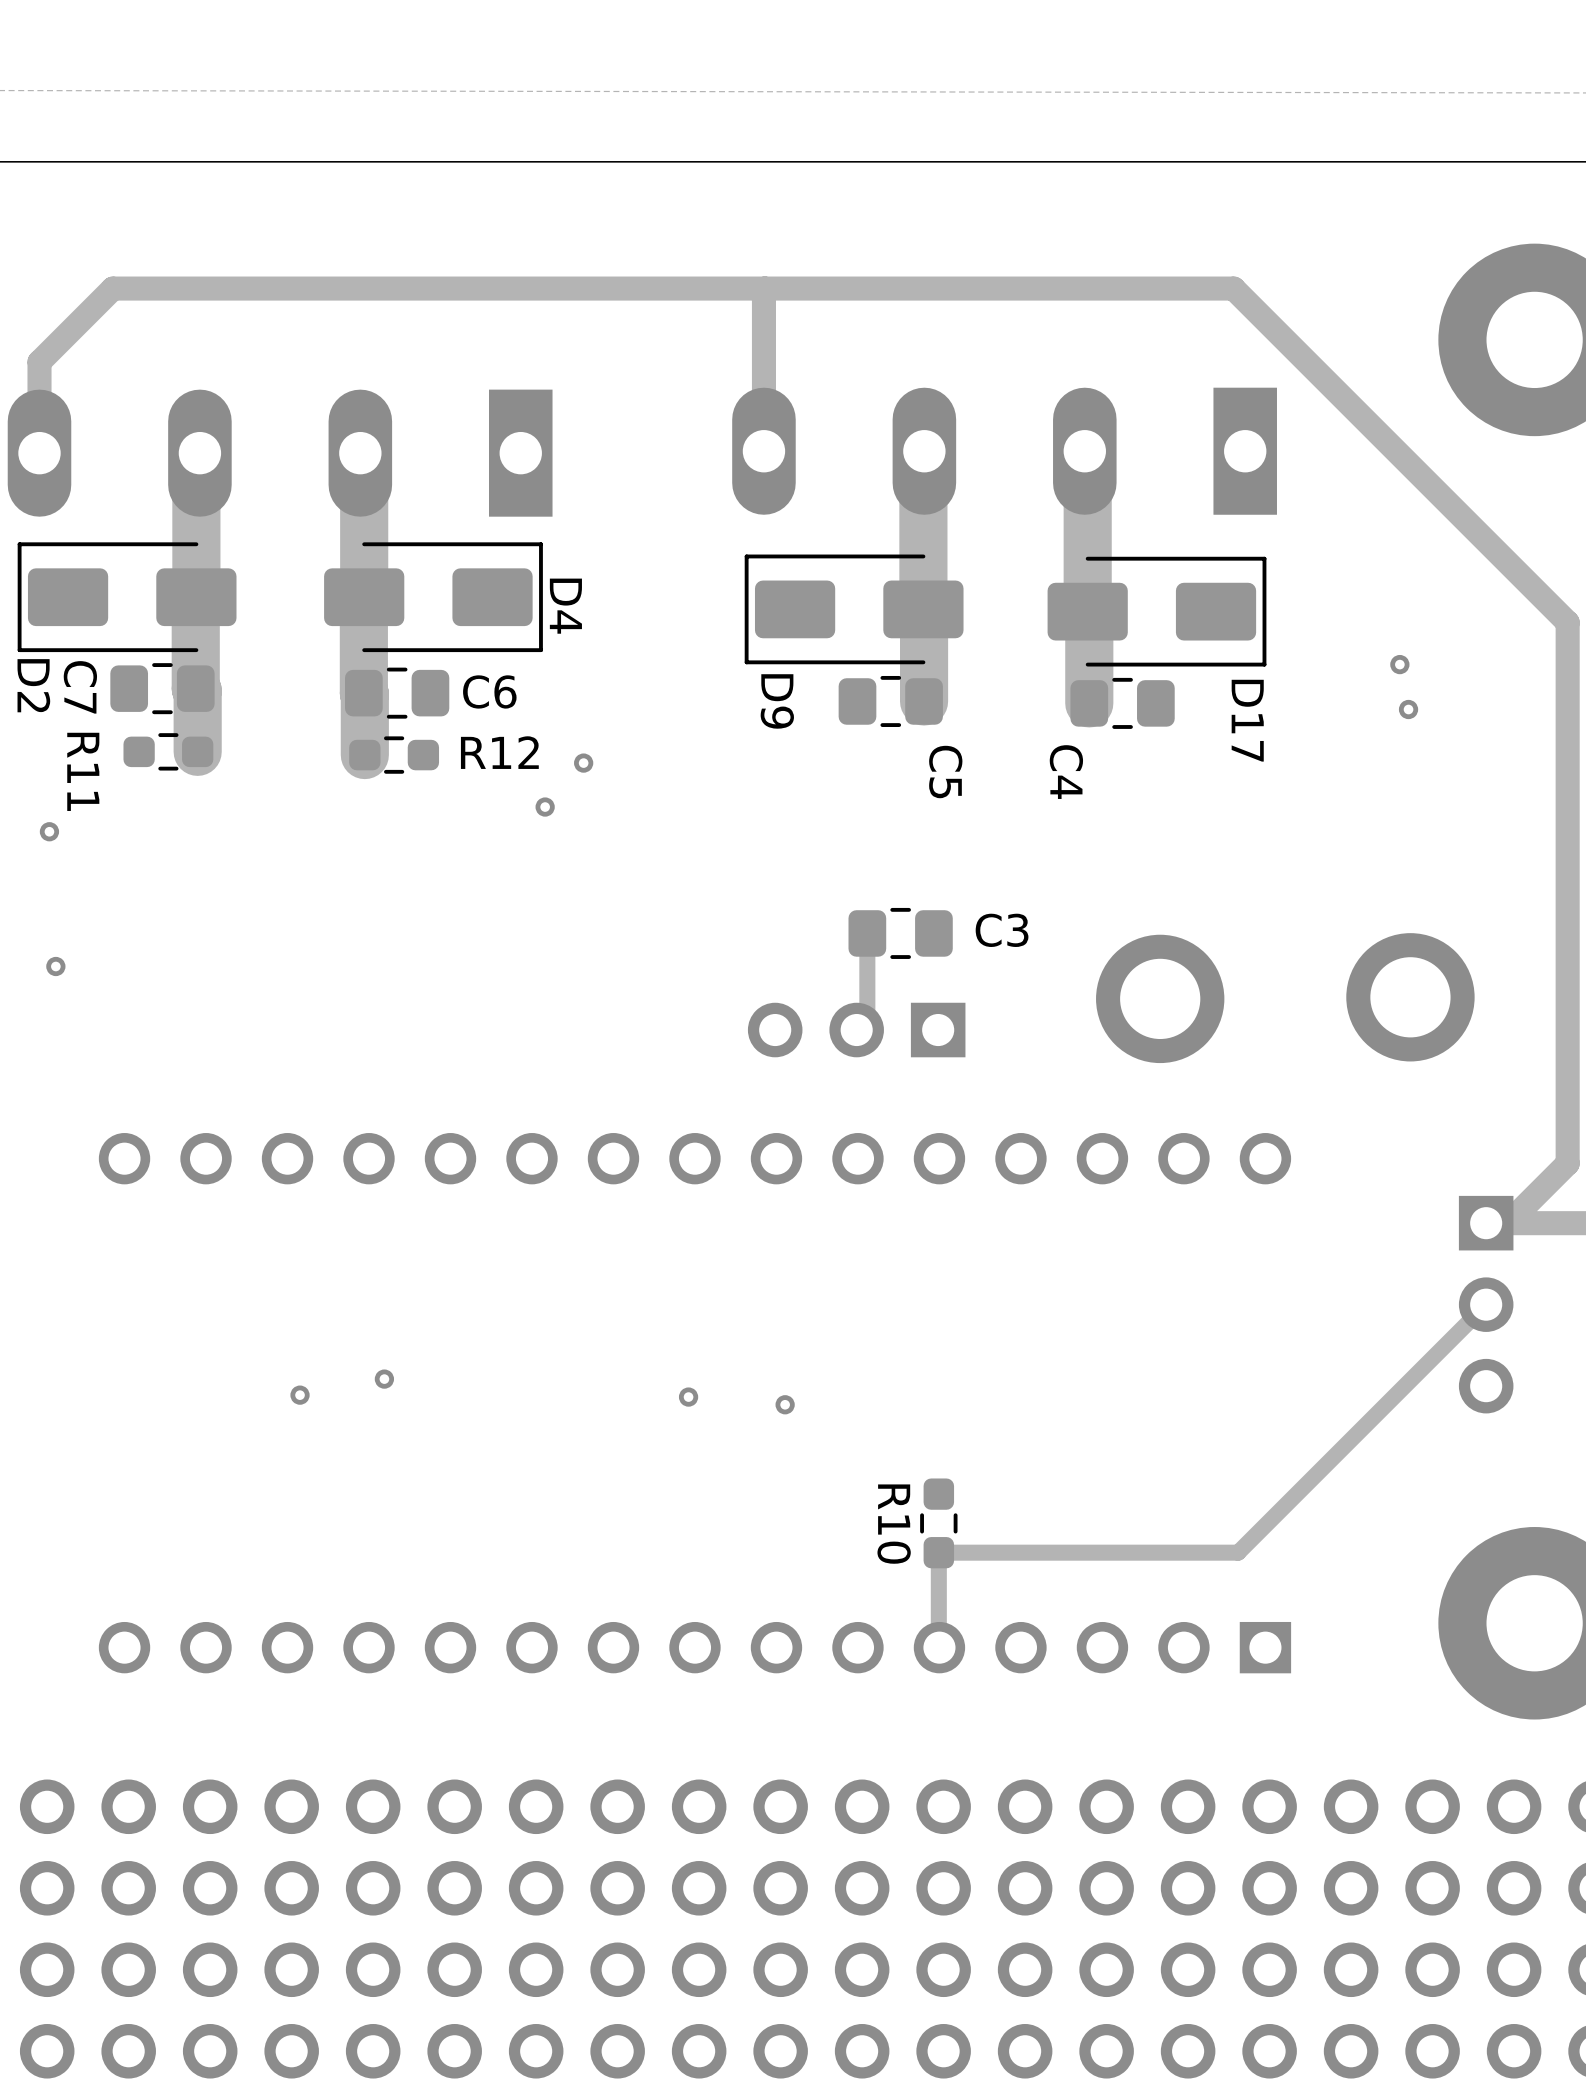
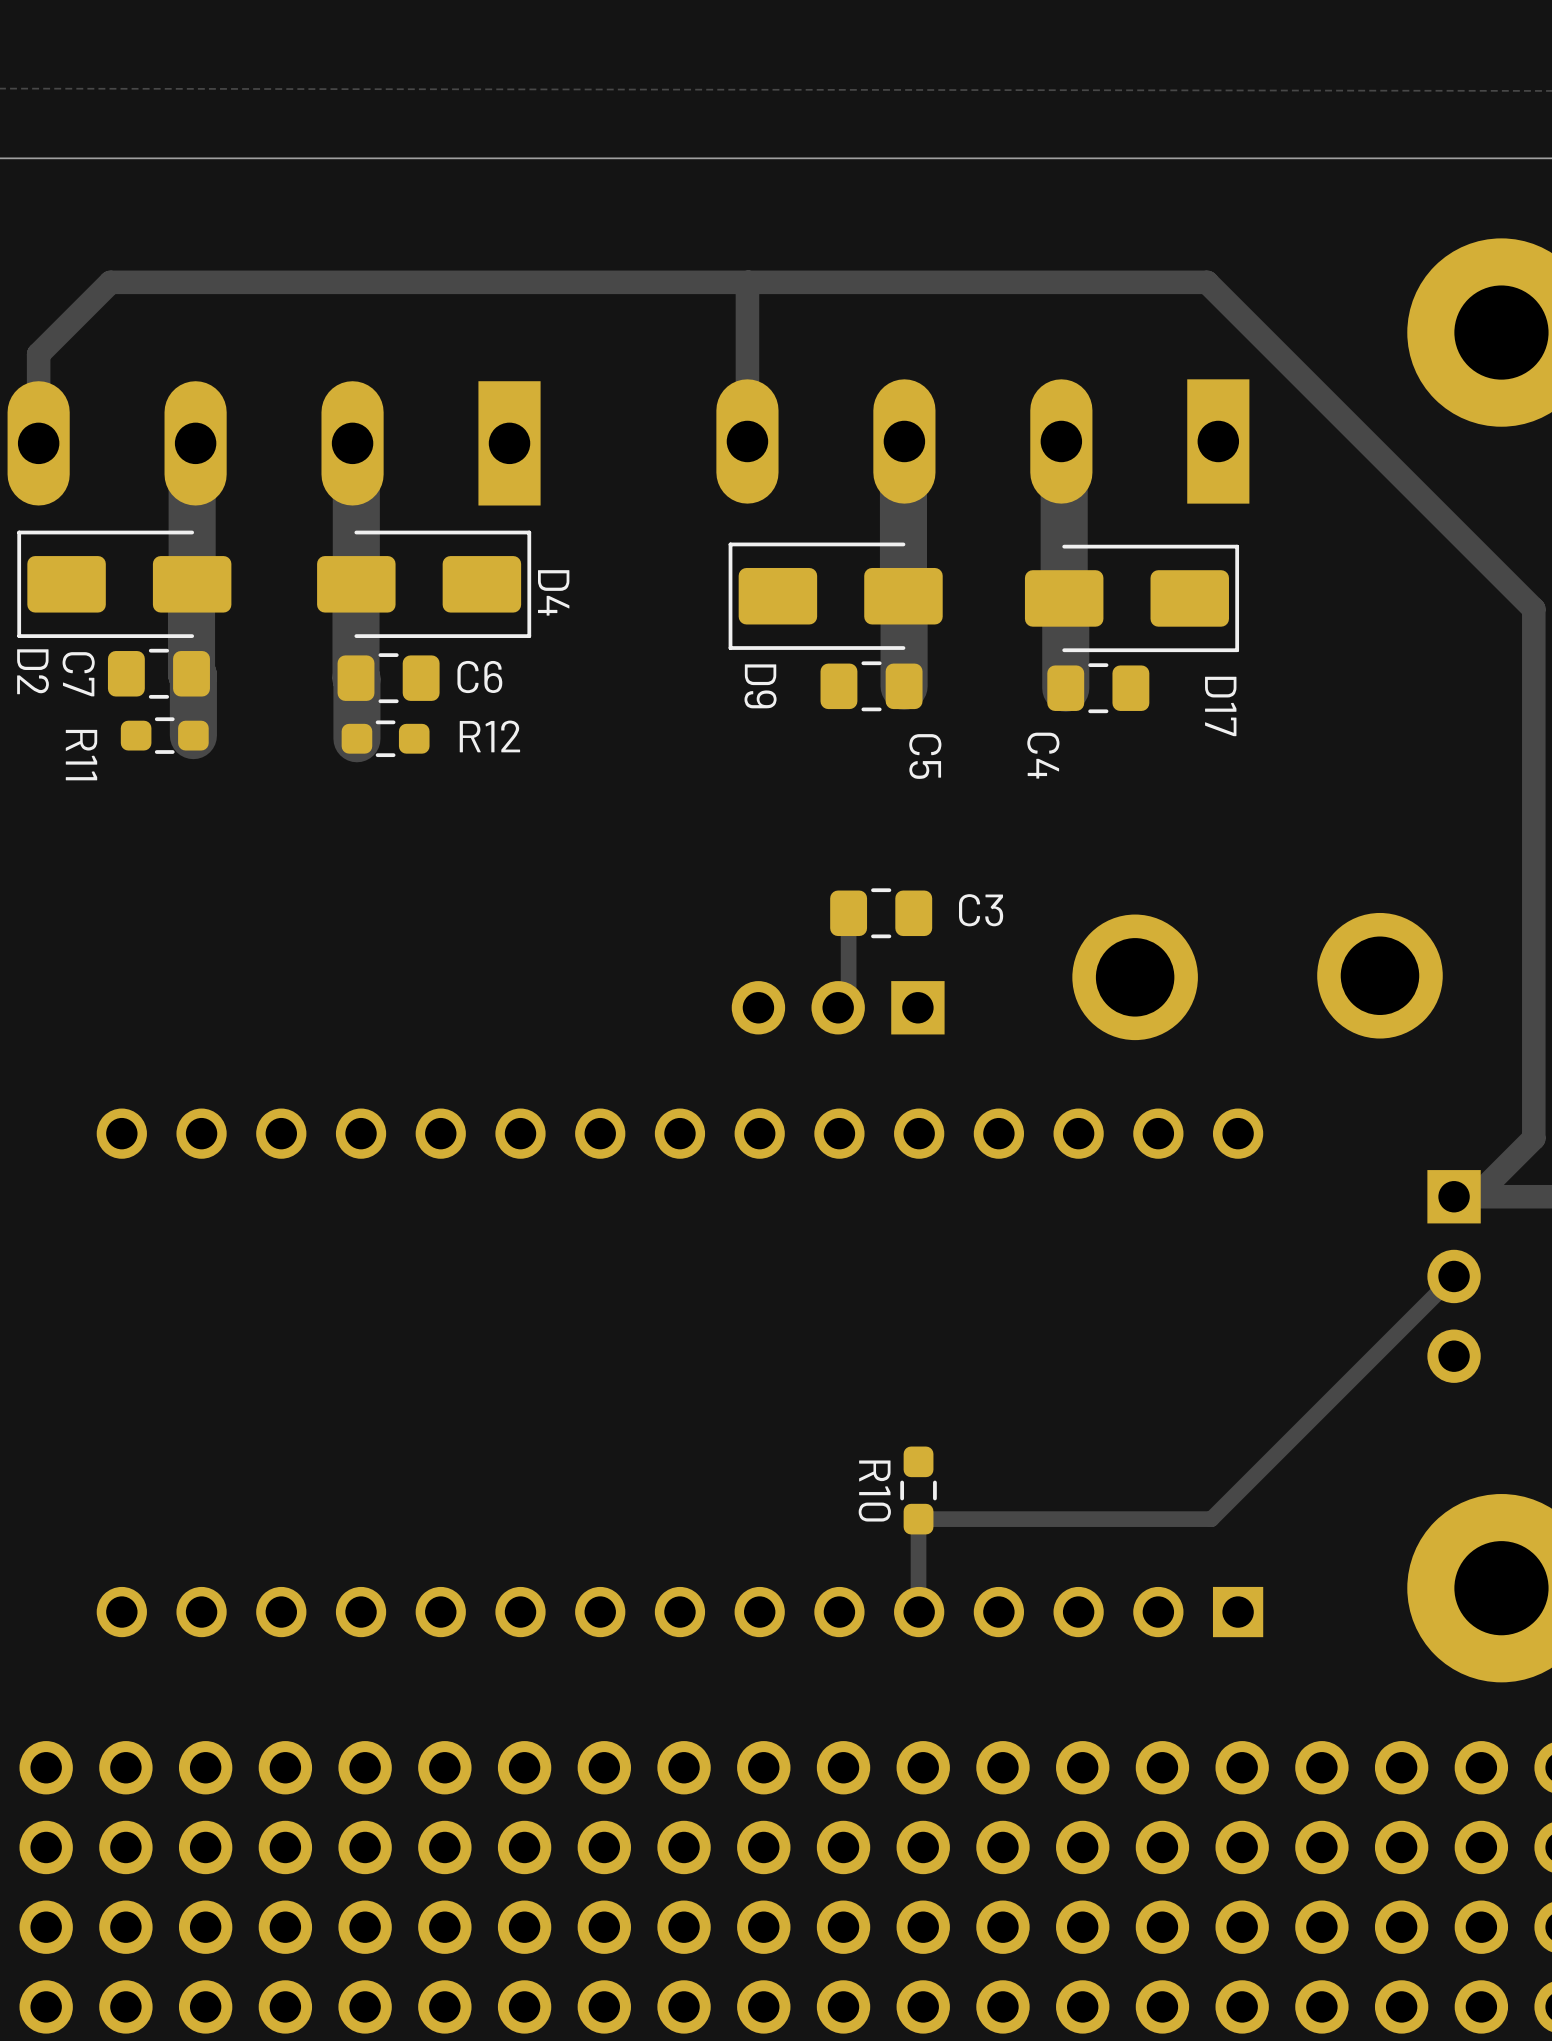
via: (1399, 664) -> none
via: (1408, 709) -> none
via: (583, 763) -> none
via: (545, 807) -> none
via: (49, 831) -> none
via: (55, 966) -> none
via: (384, 1379) -> none
via: (300, 1395) -> none
via: (688, 1397) -> none
via: (785, 1404) -> none

